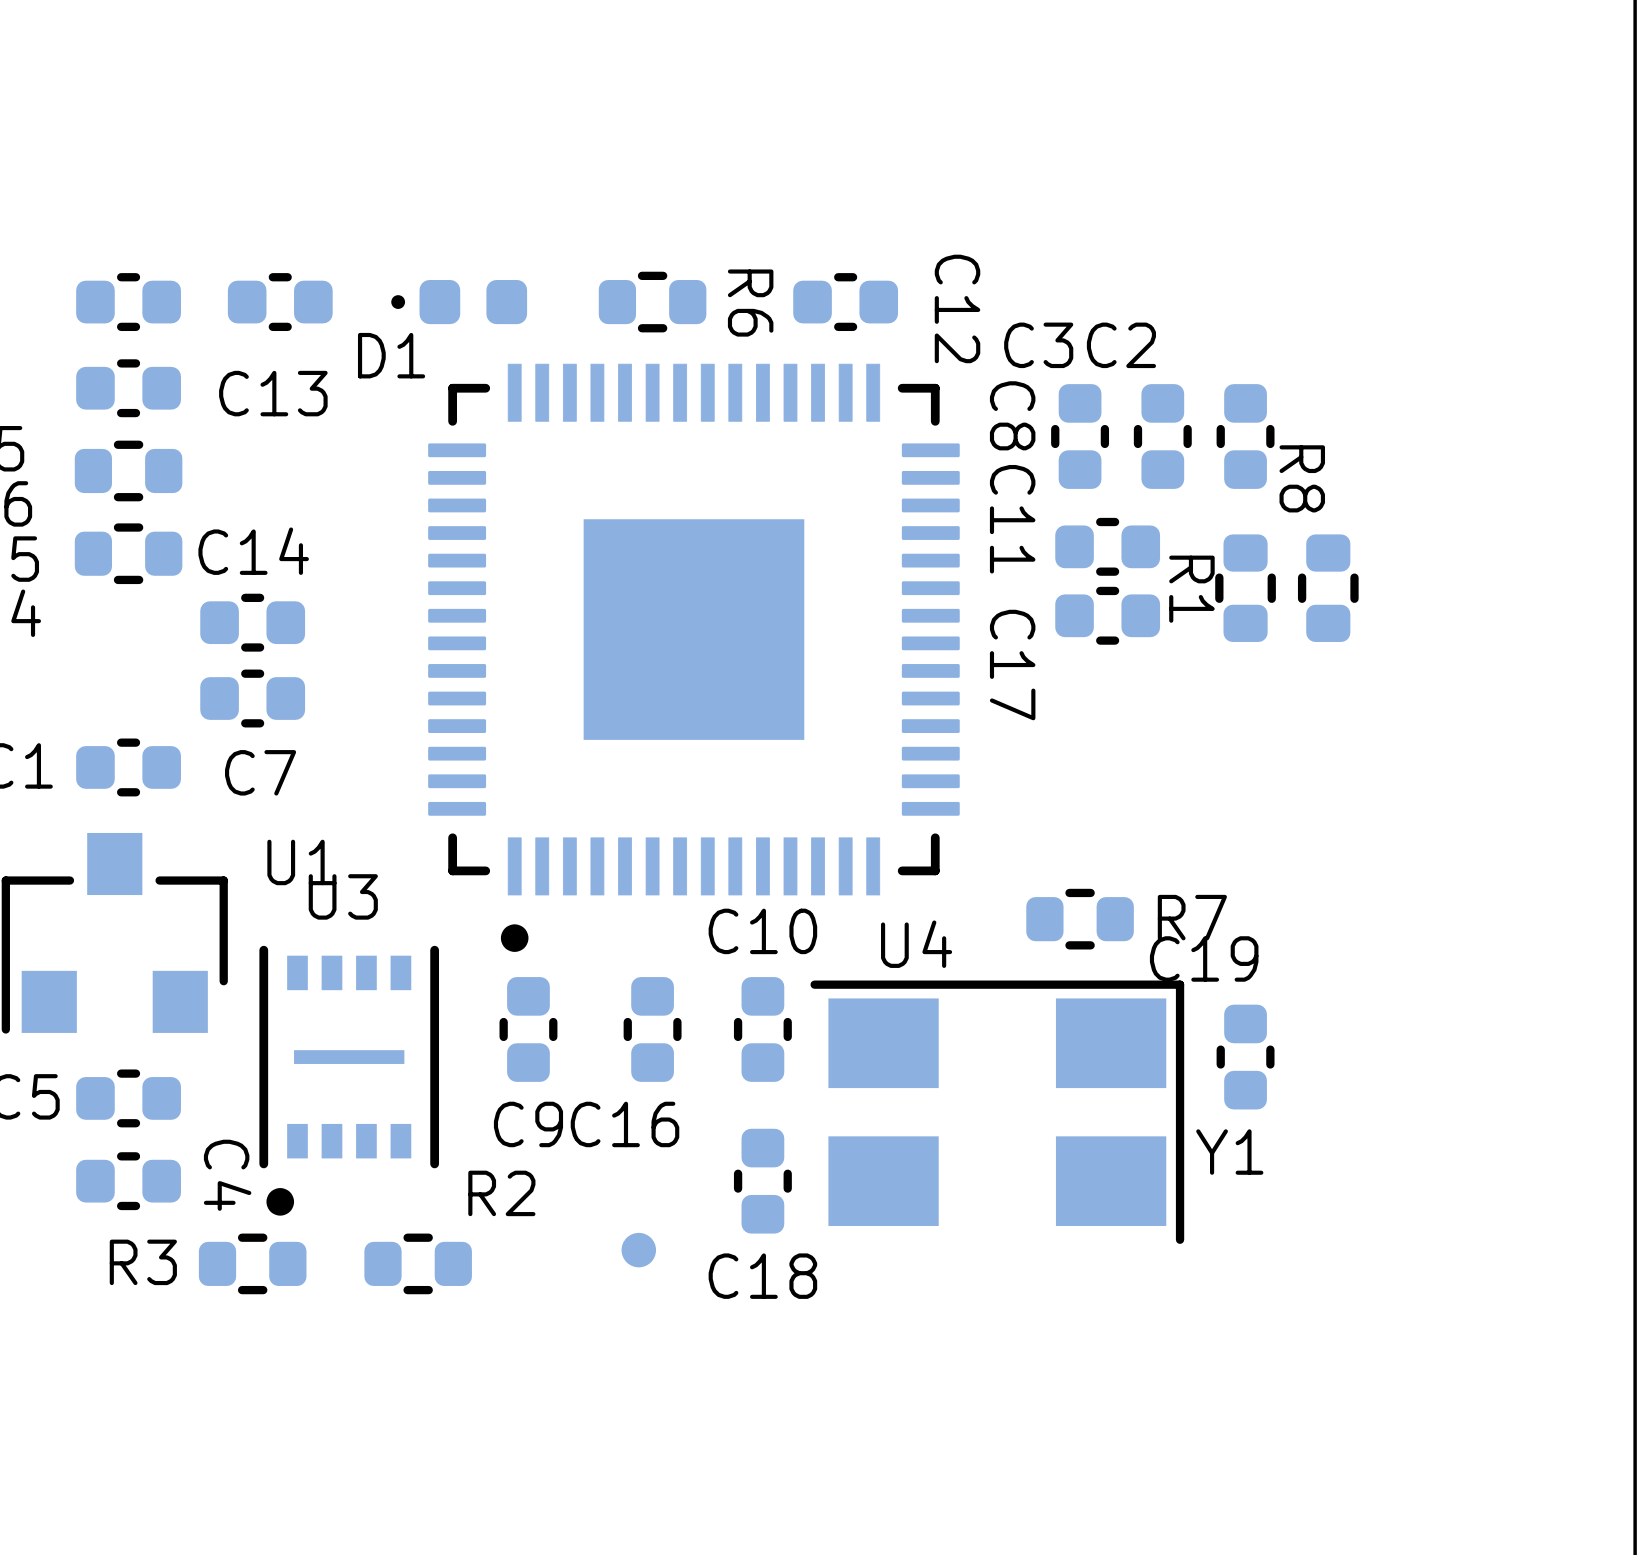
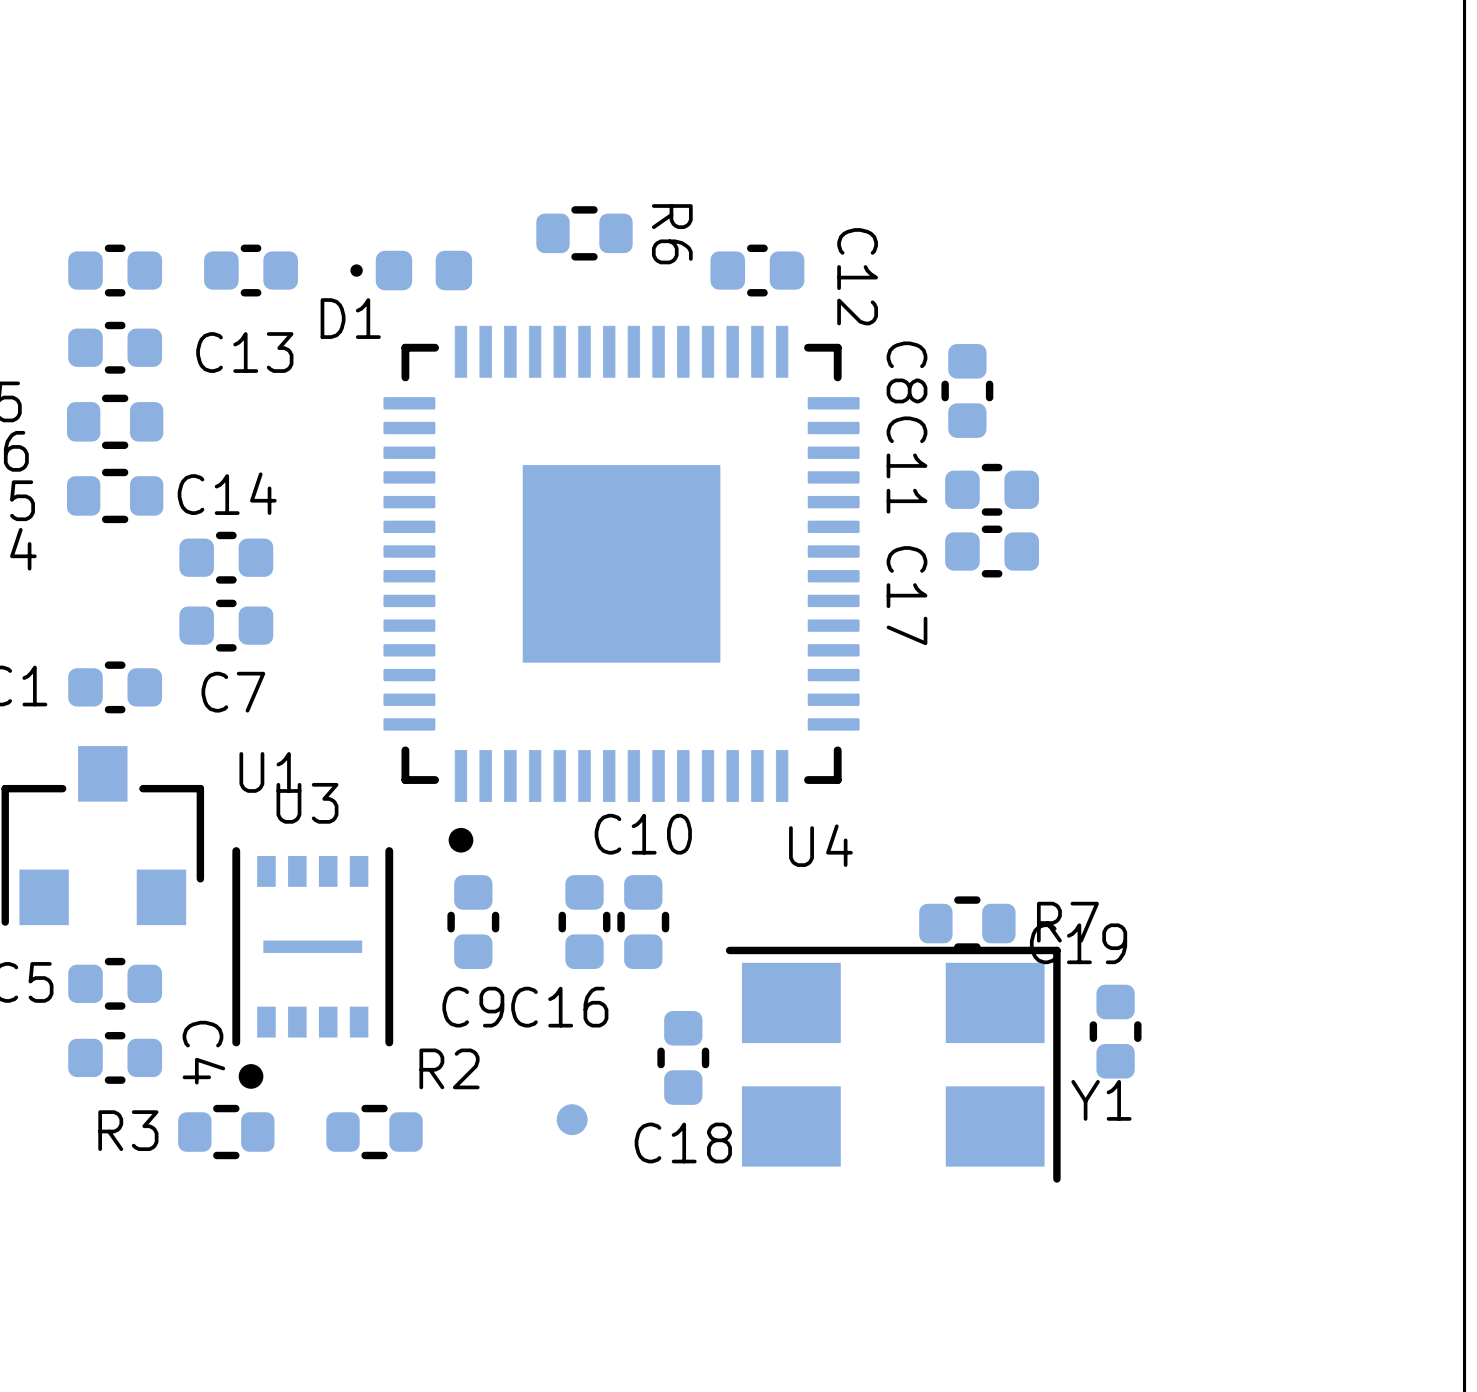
R6 position: (652, 302) -> (584, 233)
C3: (1162, 436) -> none
C2: (1245, 436) -> none
R1: (1245, 588) -> none
R8: (1328, 588) -> none
R7 position: (1080, 919) -> (967, 923)
C10 position: (762, 1029) -> (643, 922)
C19 position: (1245, 1057) -> (1115, 1031)
Y1 position: (997, 1112) -> (893, 1064)

